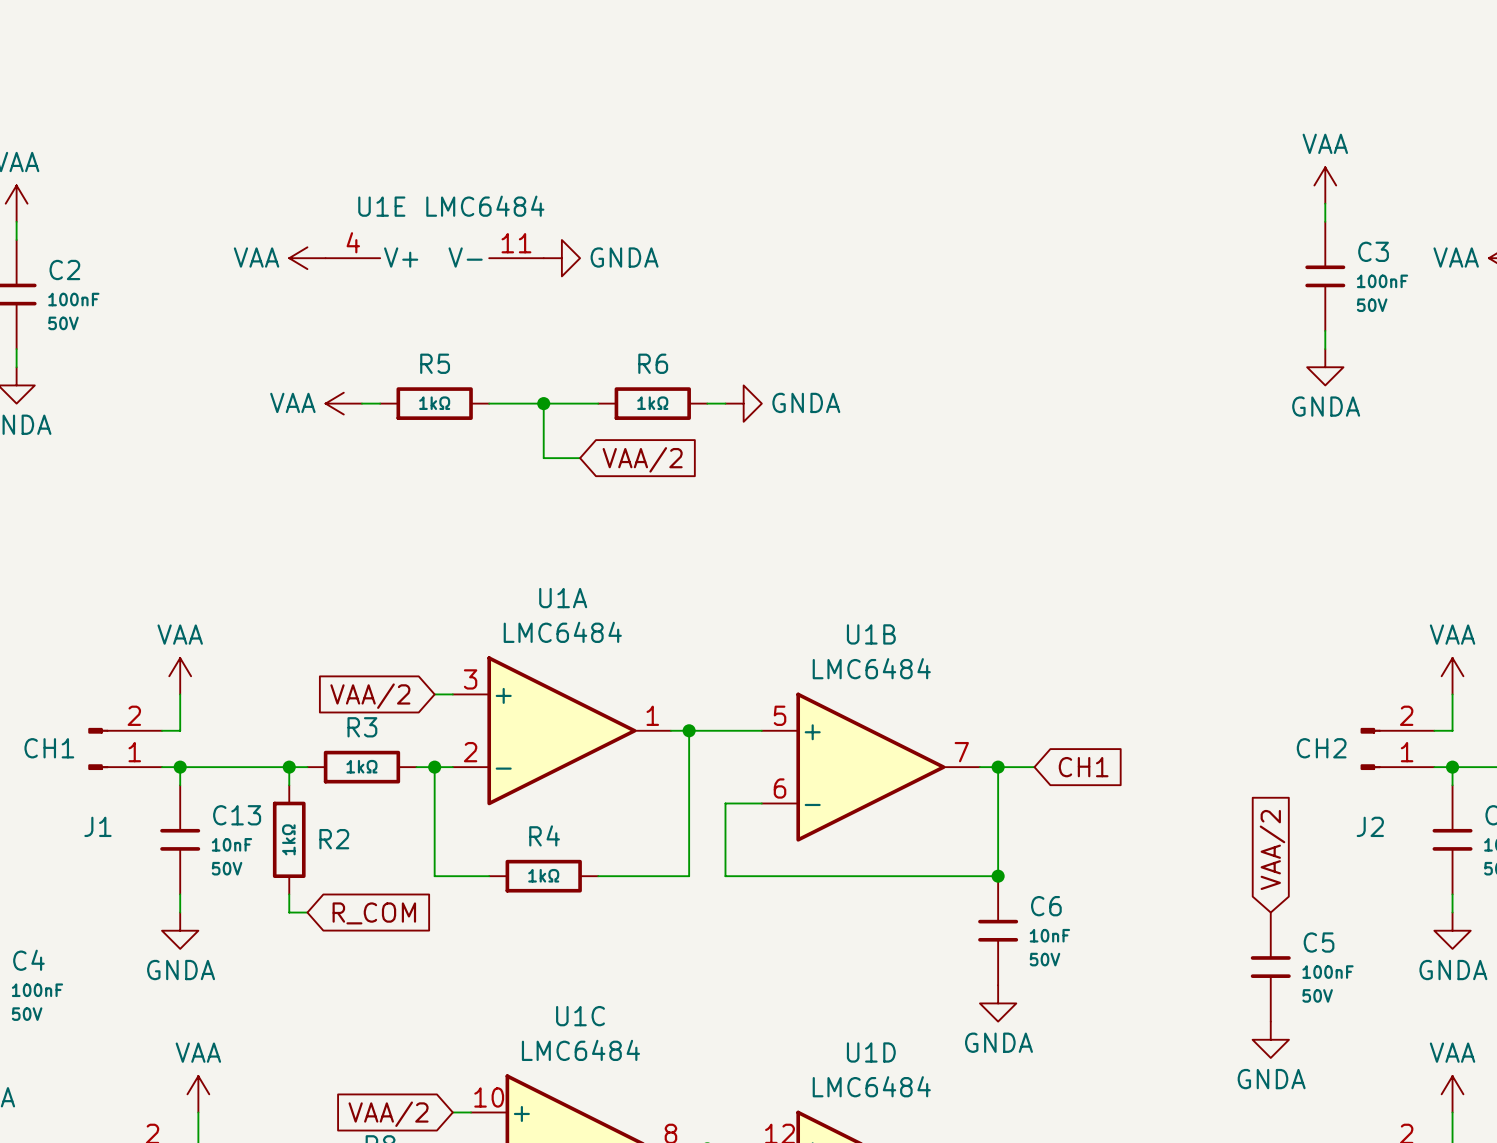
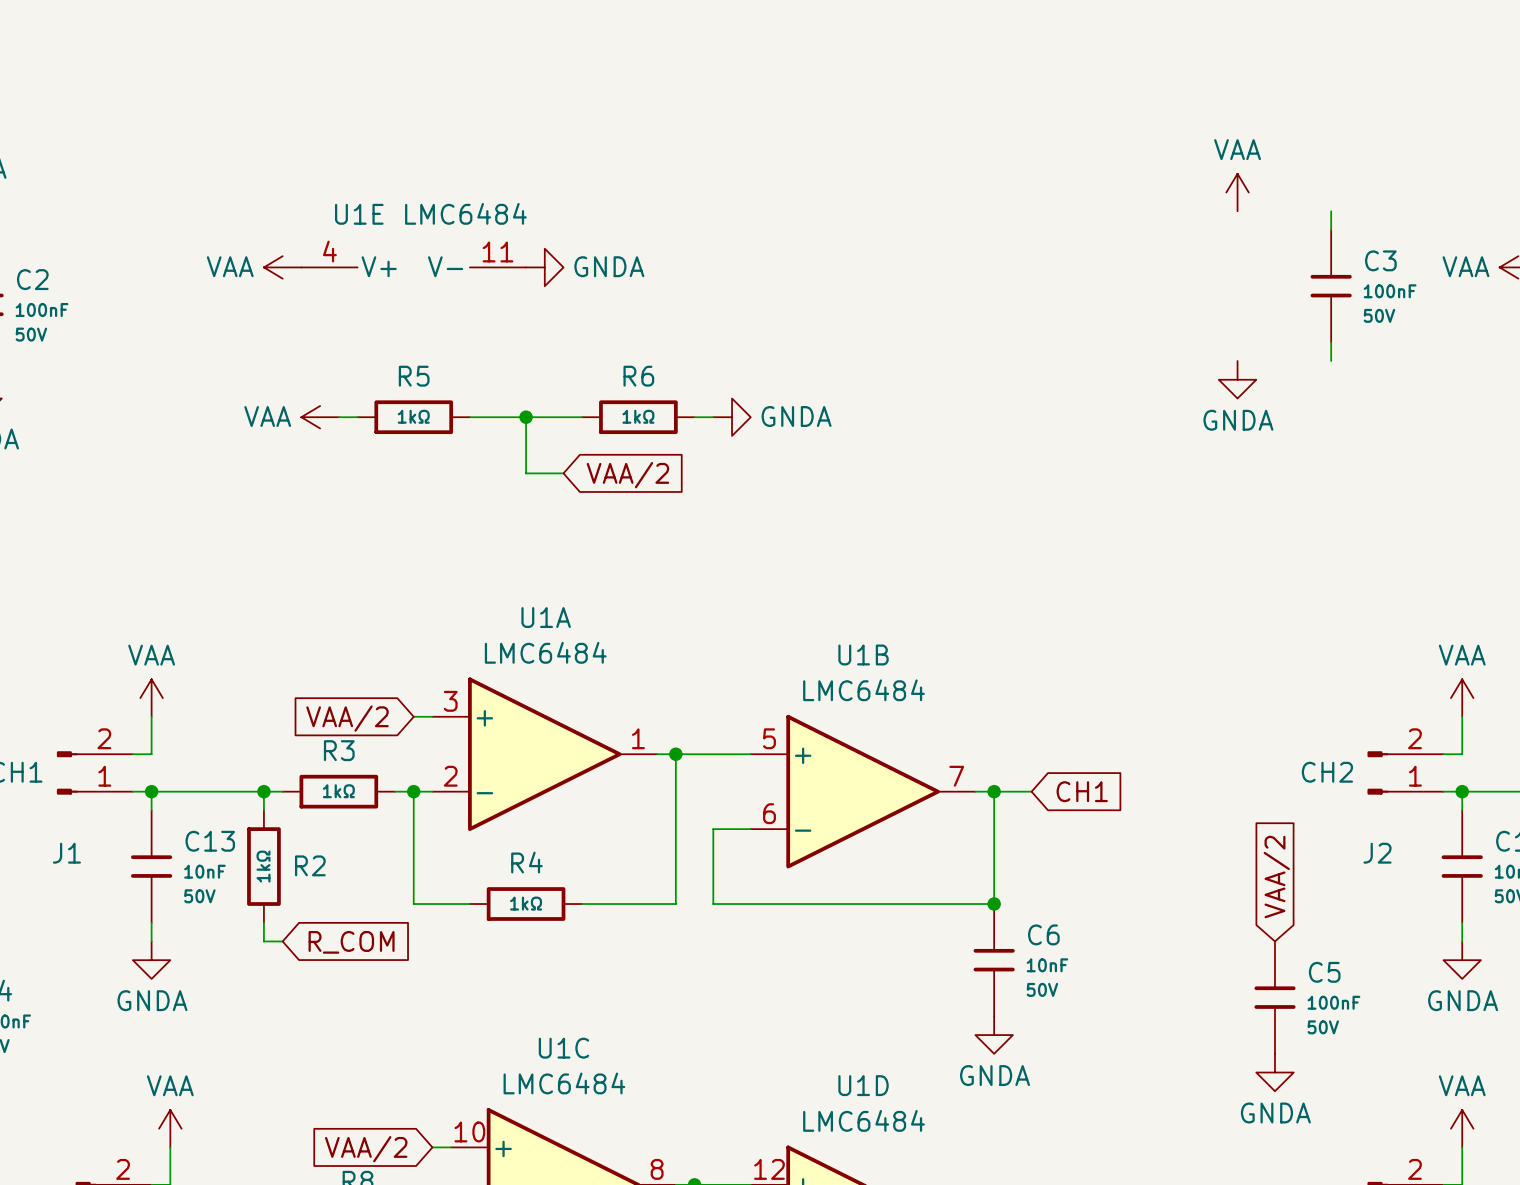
power symbol position: VAA (1325, 185) -> VAA (1237, 192)
power symbol position: GNDA (1325, 367) -> GNDA (1237, 379)

